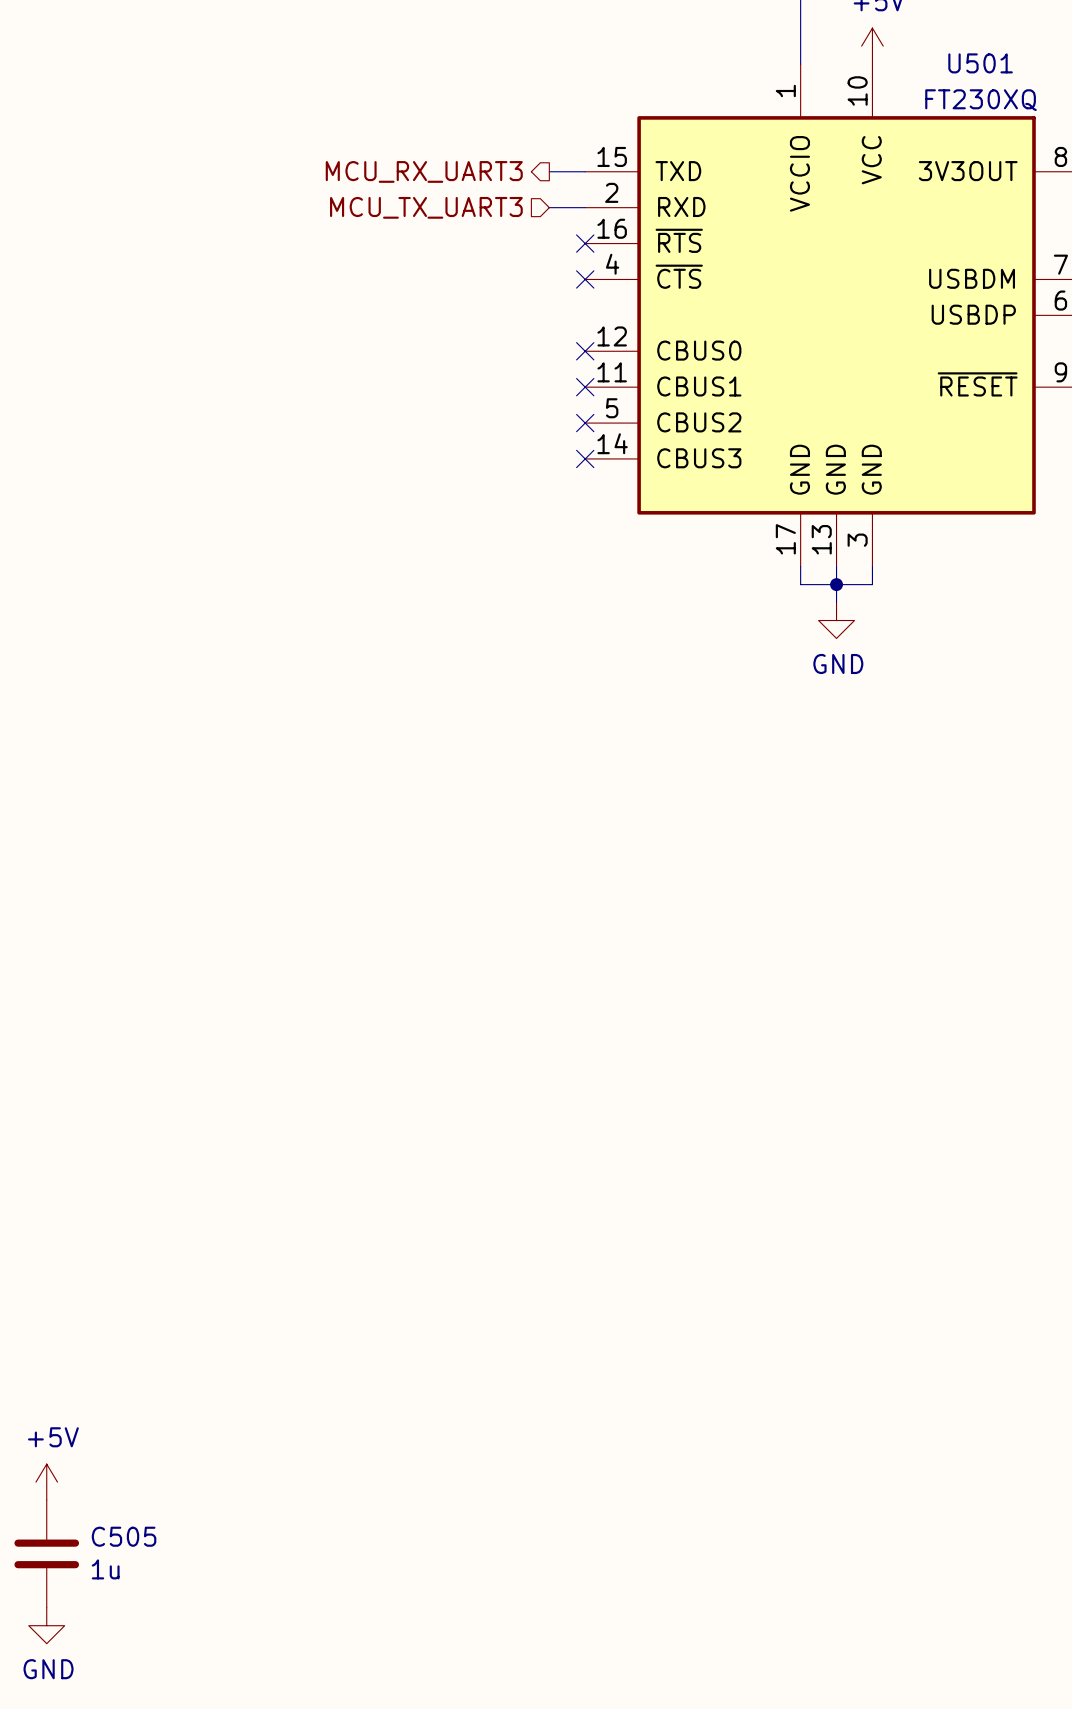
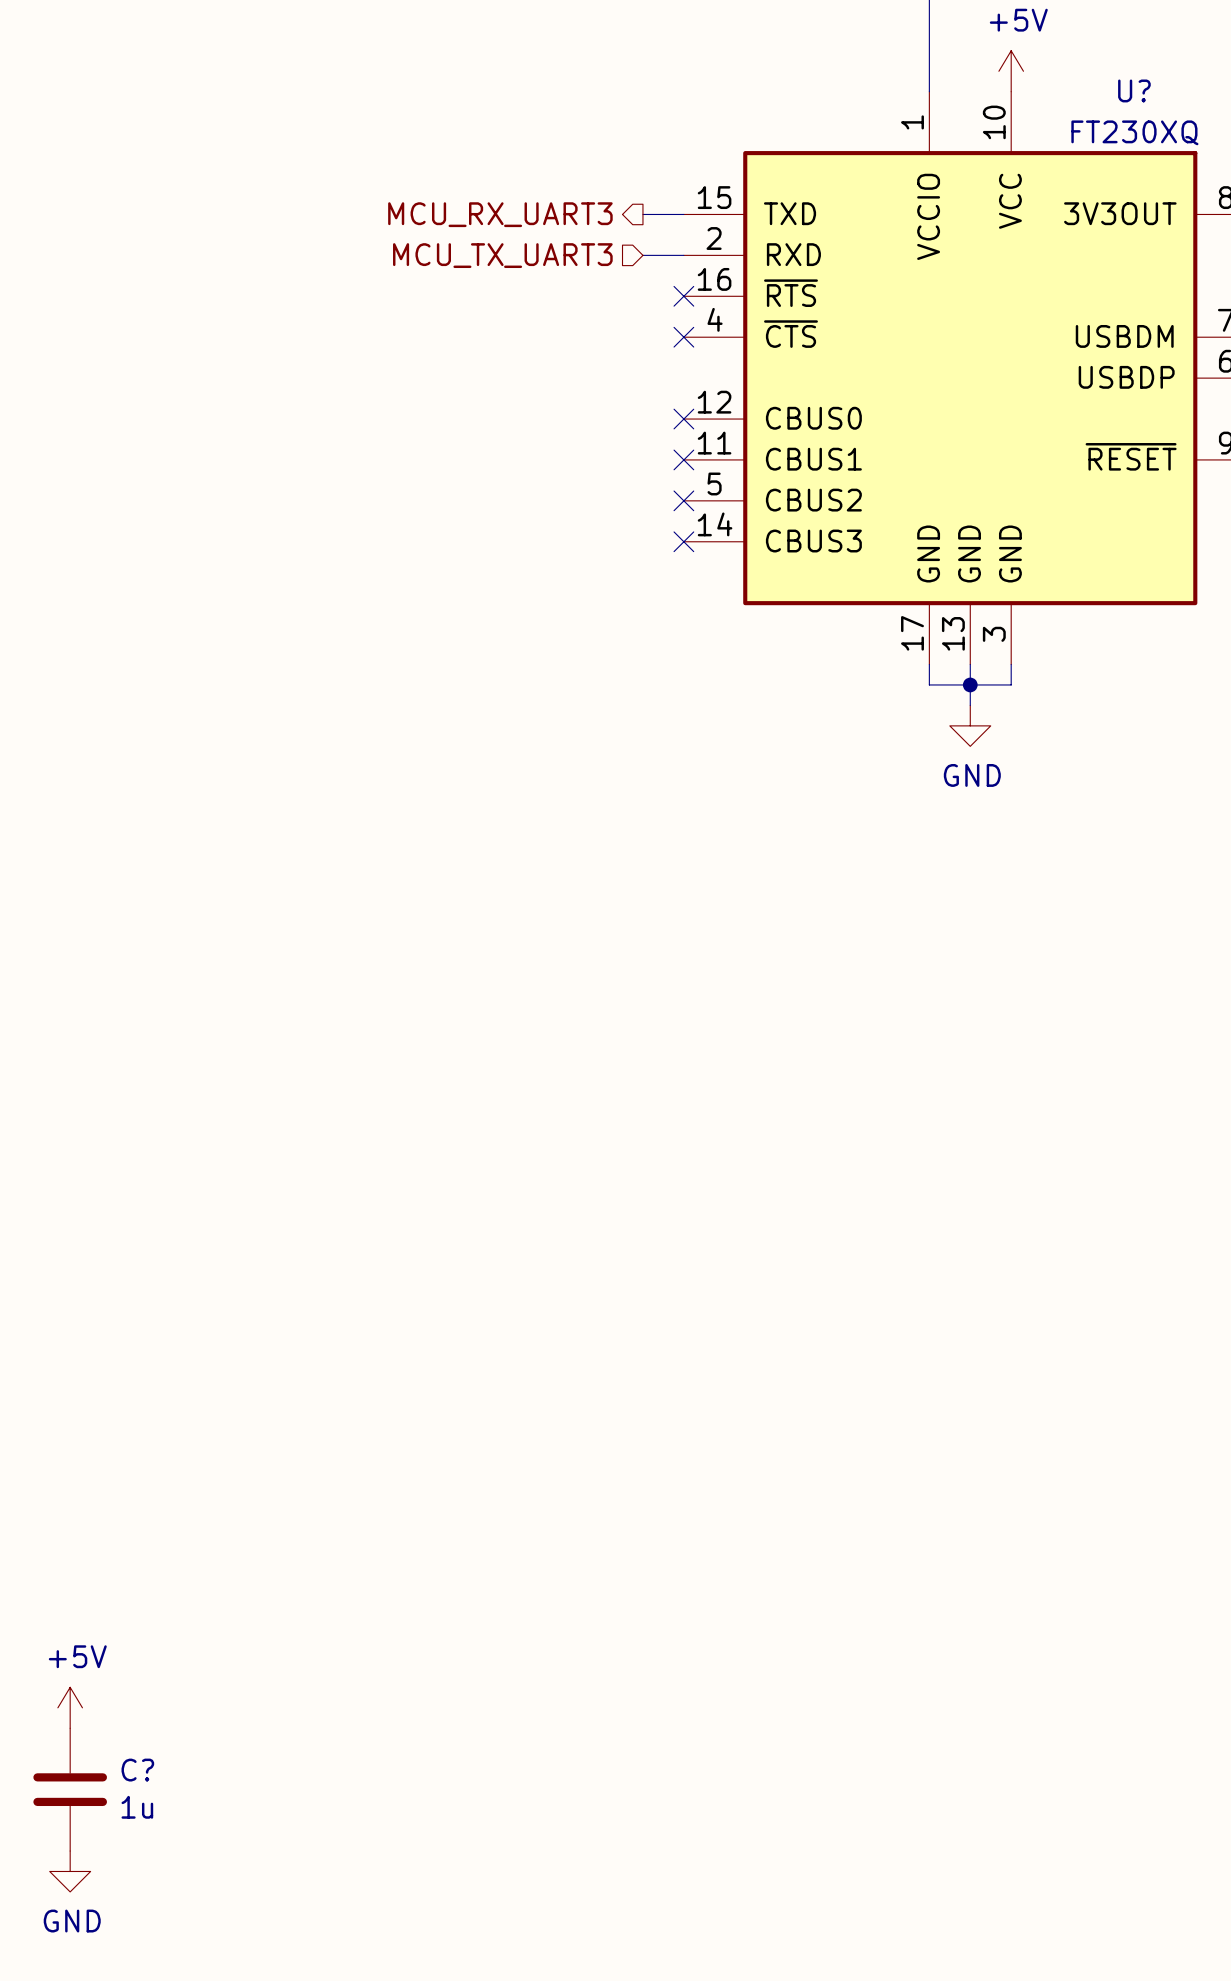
U501 name: U501 (980, 63) -> U? (1134, 90)
C505 name: C505 (124, 1536) -> C? (137, 1770)

